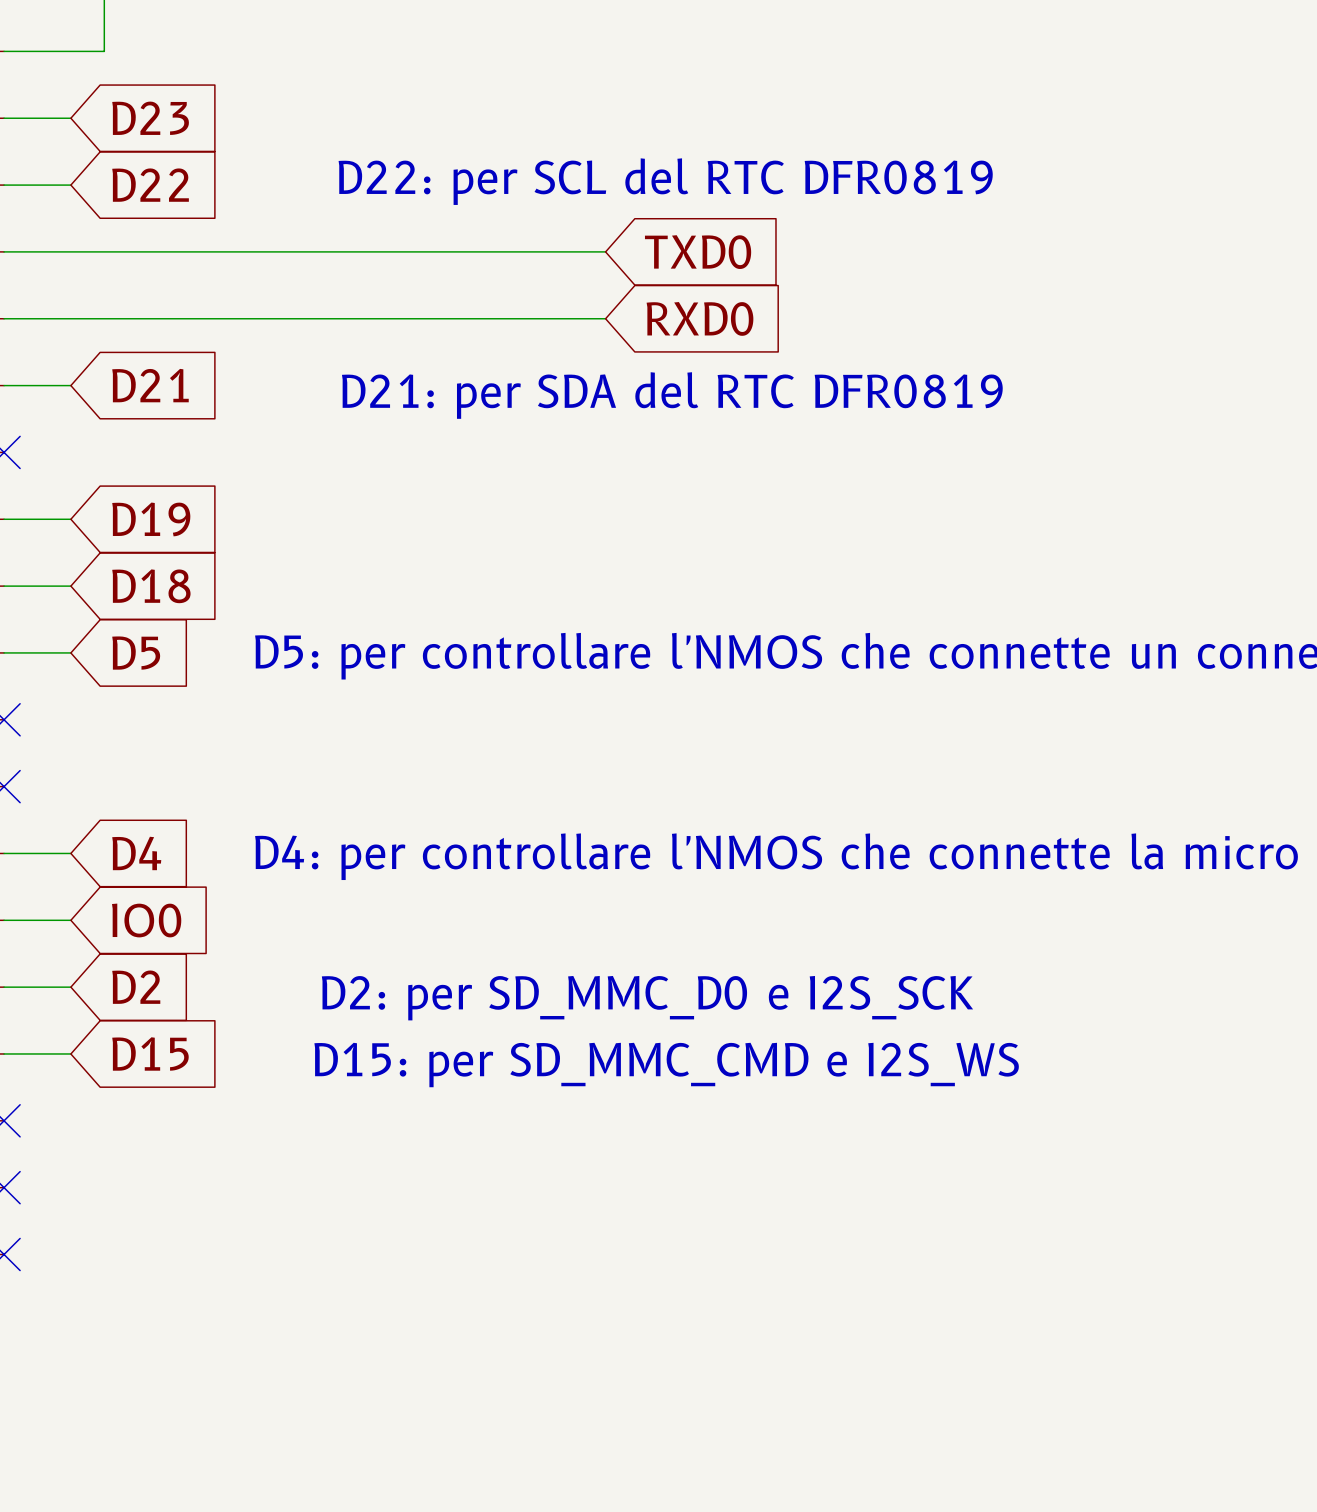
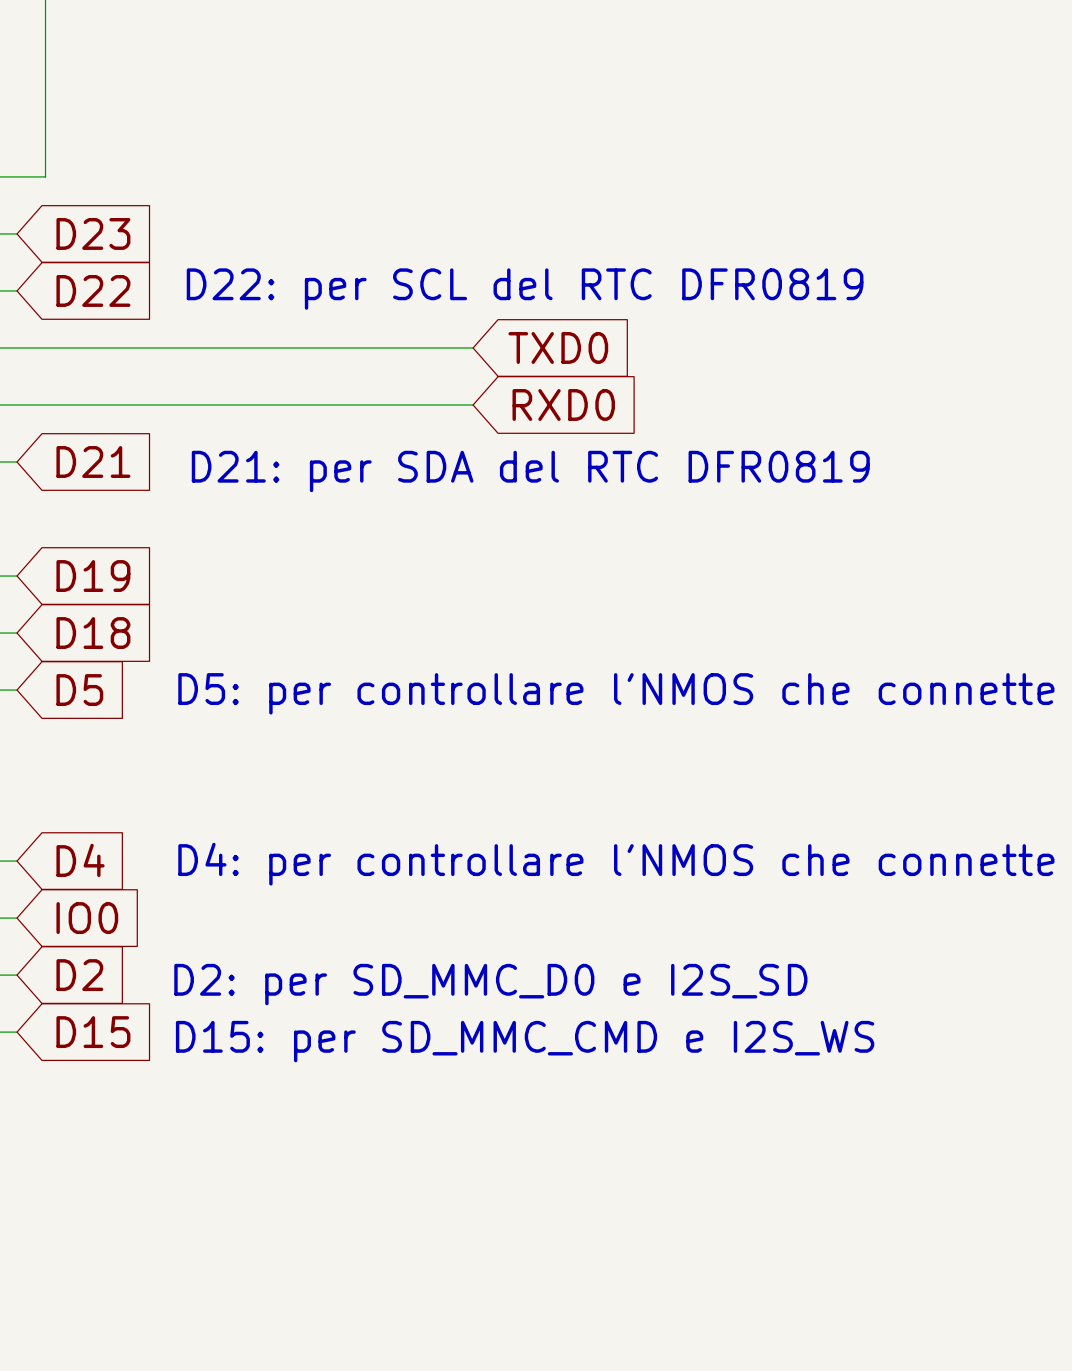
text: D2: per SD_MMC_D0 e I2S_SCK (647, 998) -> D2: per SD_MMC_D0 e I2S_SD (490, 984)

